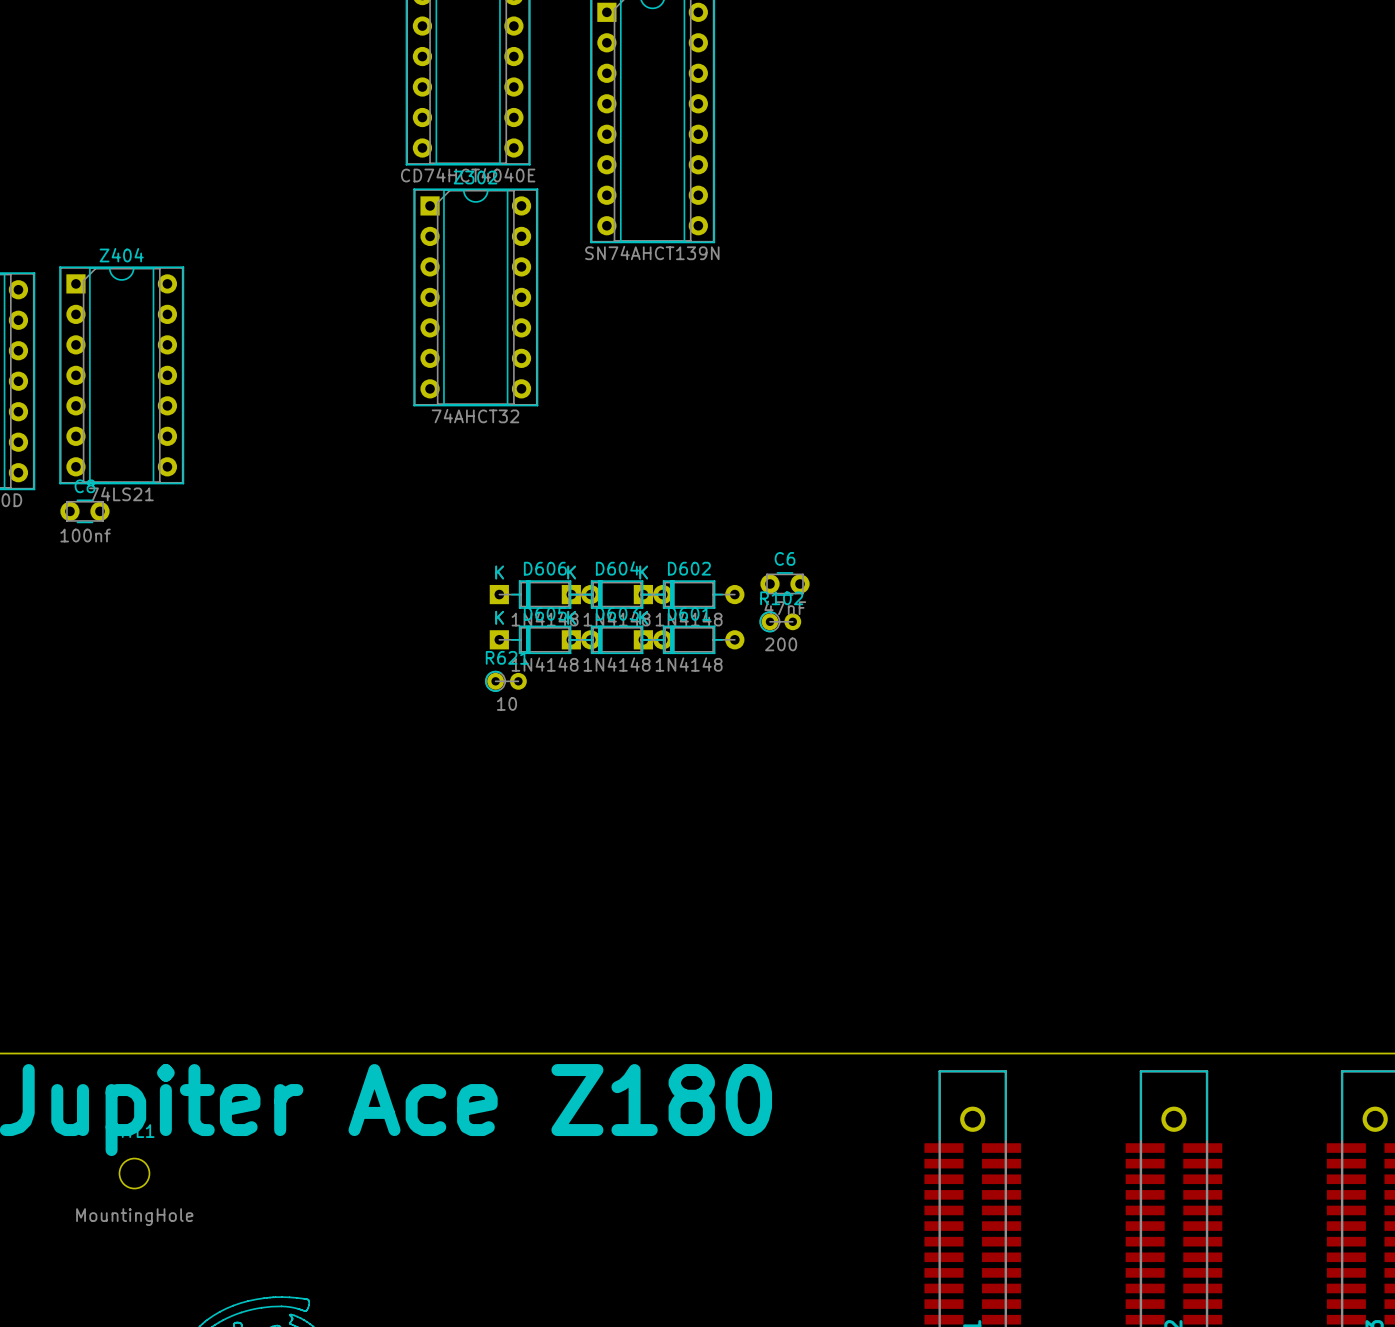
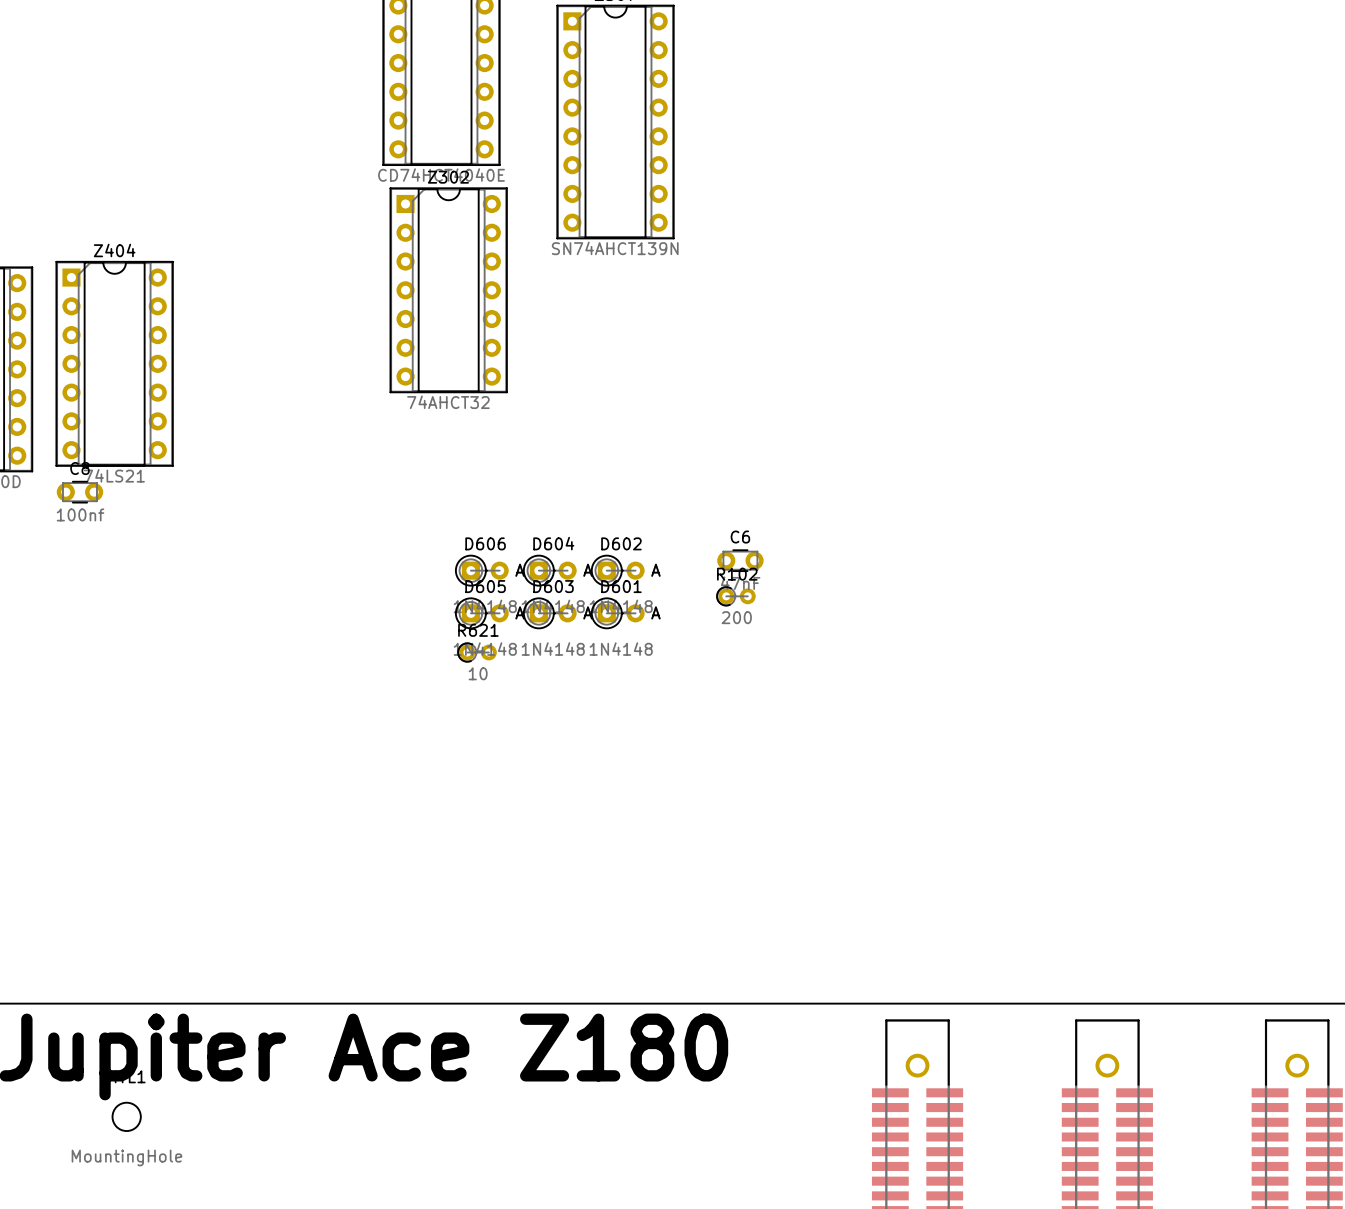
D606 footprint: [489, 580, 601, 609] -> [455, 554, 509, 587]
D604 footprint: [561, 580, 673, 609] -> [523, 554, 577, 587]
D602 footprint: [633, 580, 745, 609] -> [591, 554, 645, 587]
D605 footprint: [489, 625, 601, 654] -> [455, 597, 509, 630]
D603 footprint: [561, 625, 673, 654] -> [523, 597, 577, 630]
D601 footprint: [633, 625, 745, 654] -> [591, 597, 645, 630]

